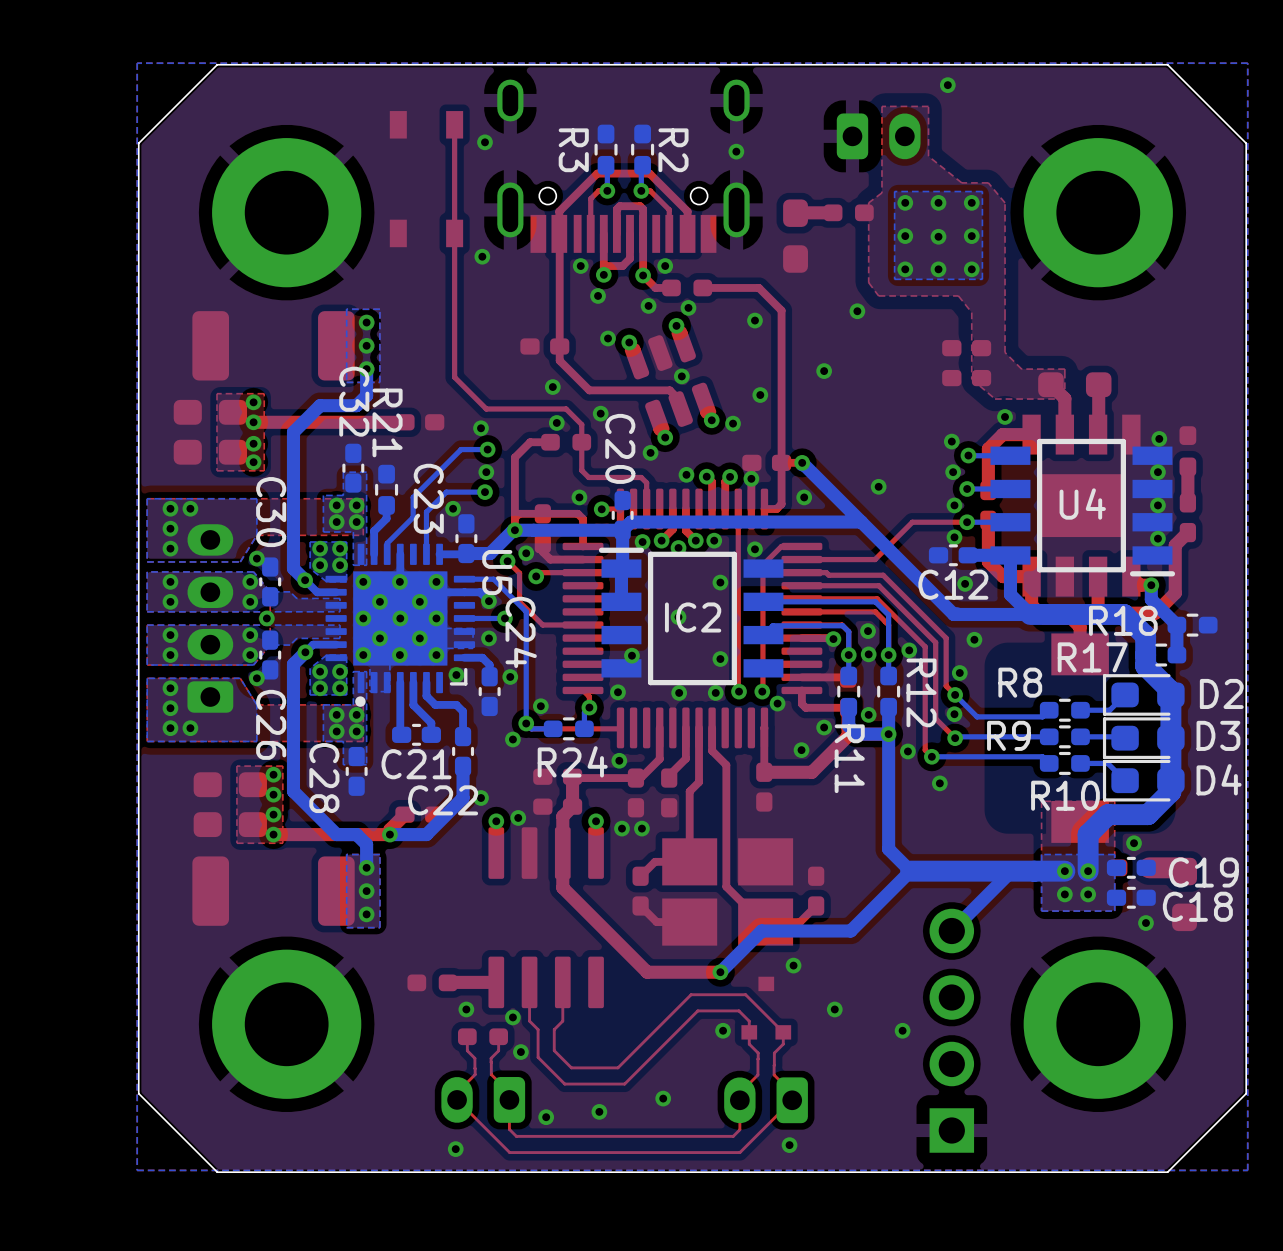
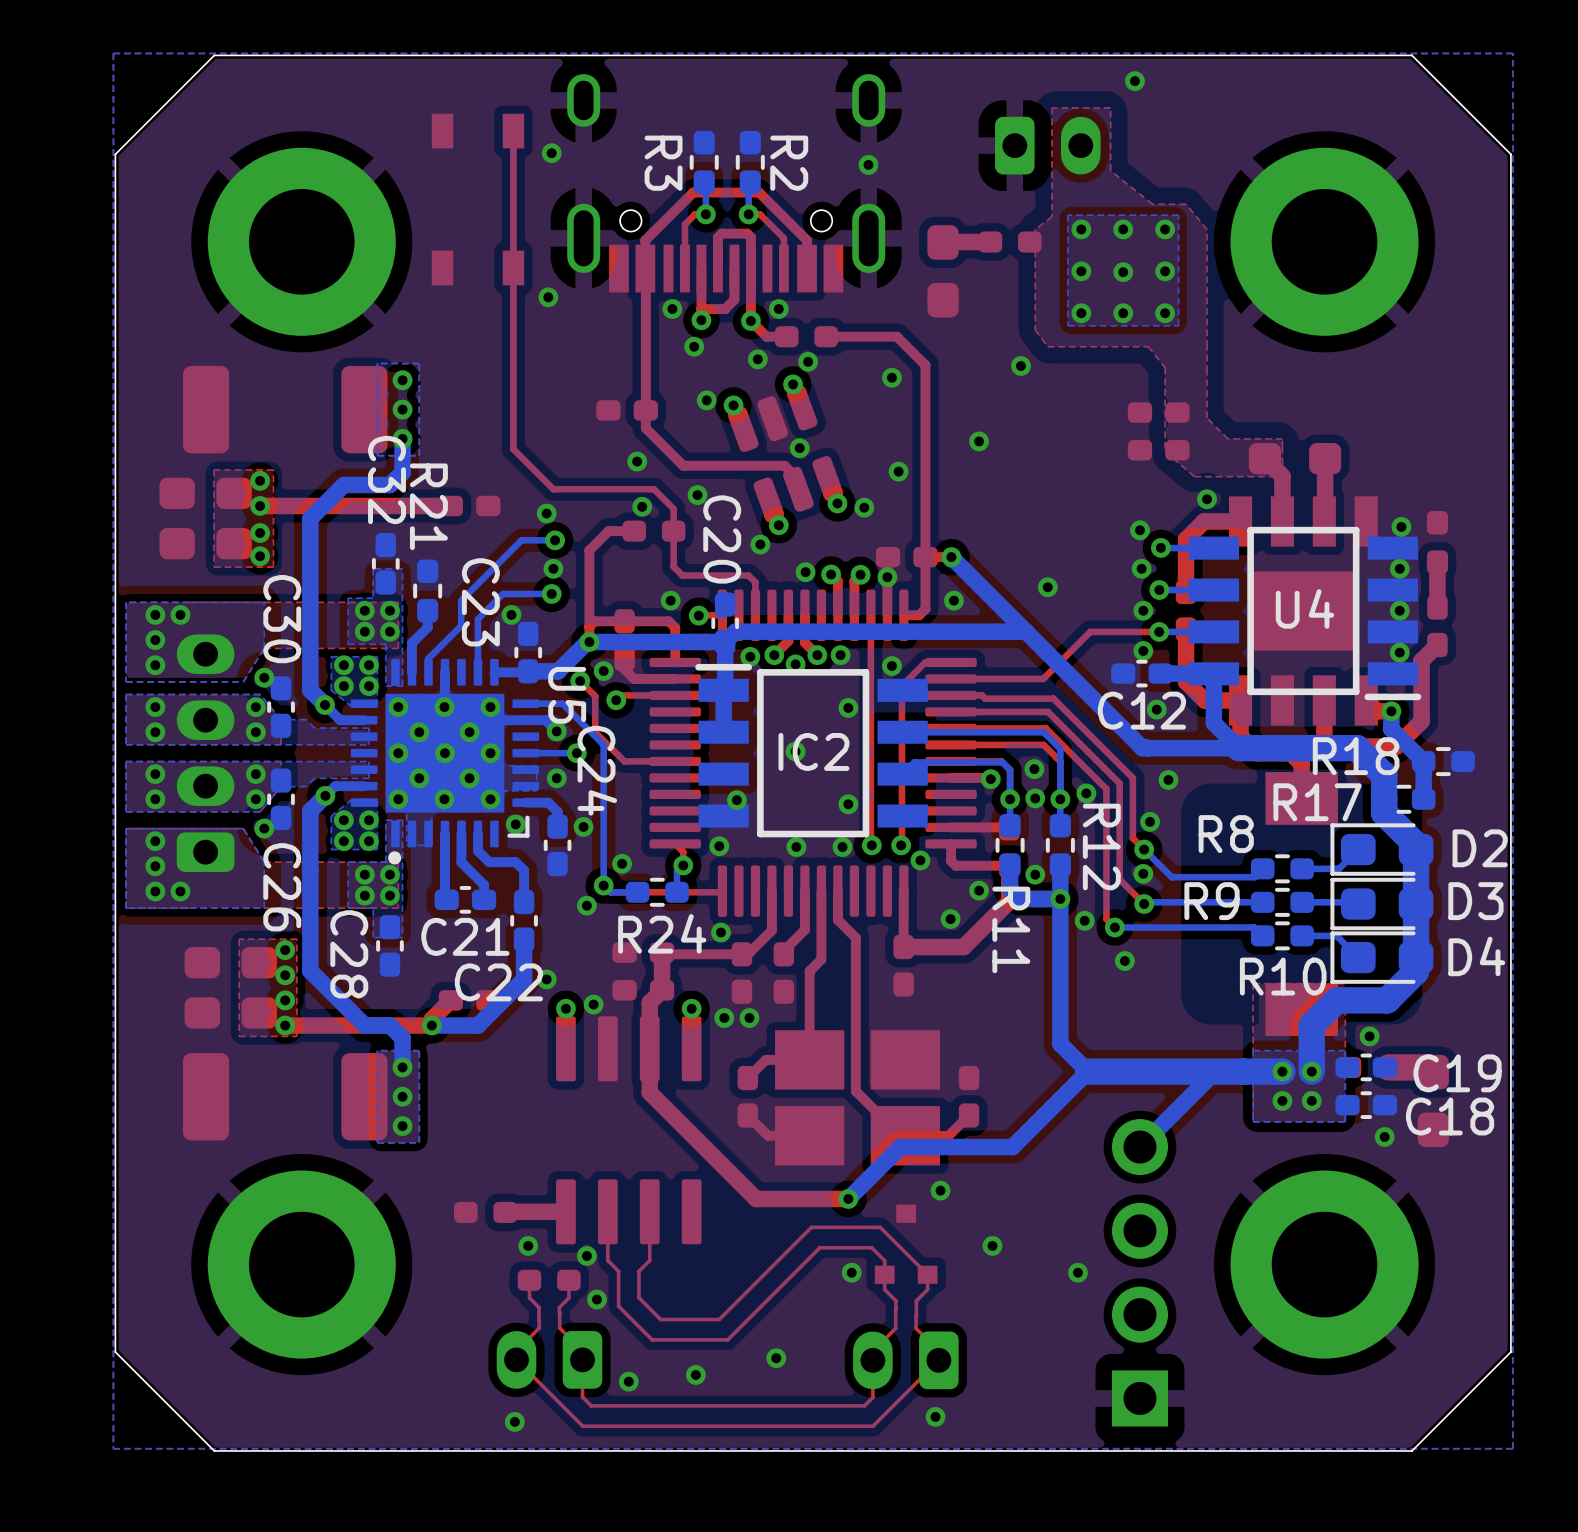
via: (266, 618) -> none

